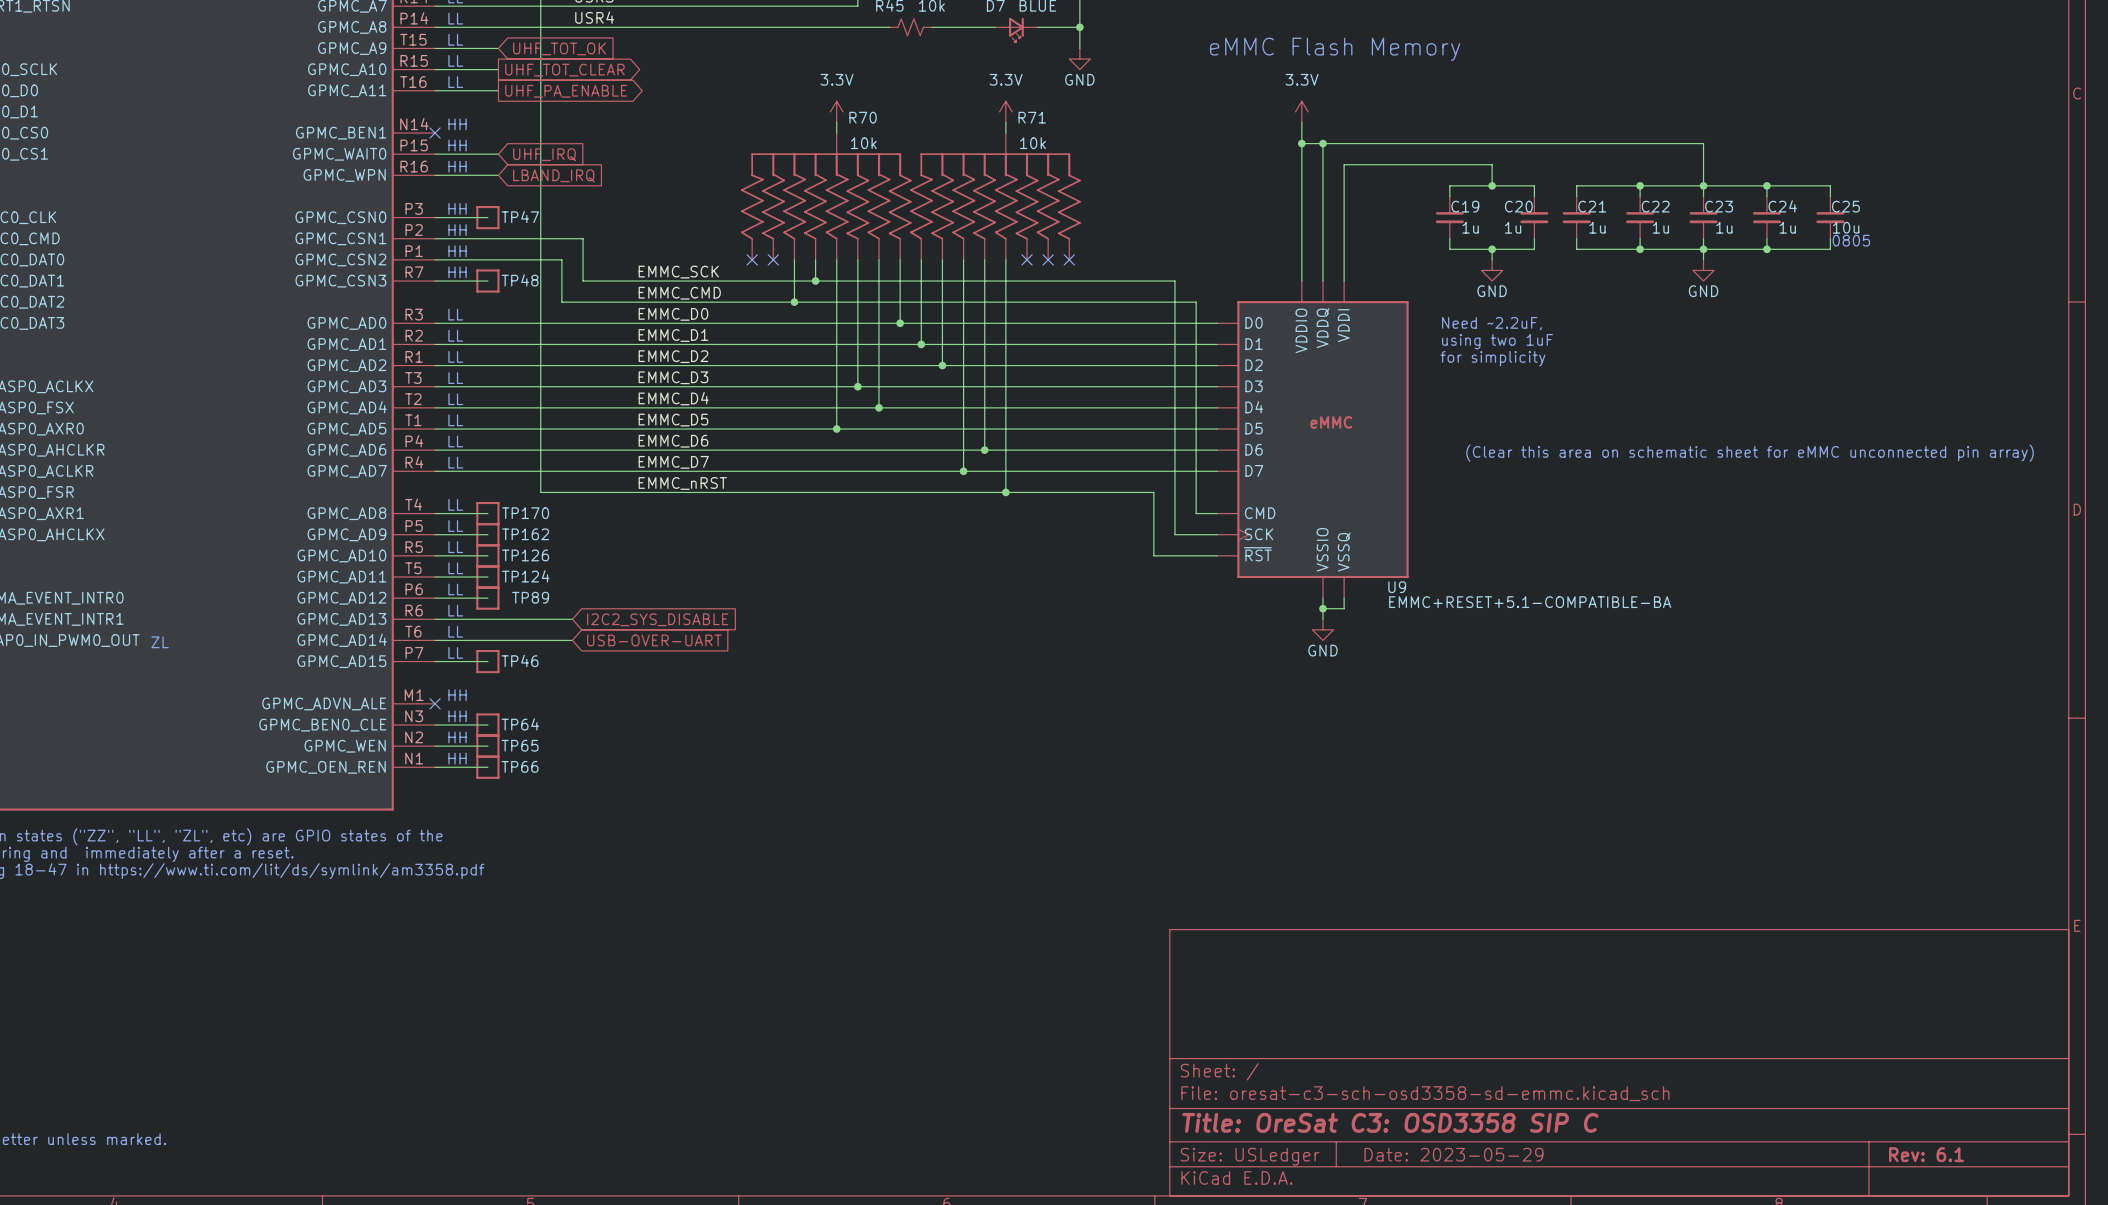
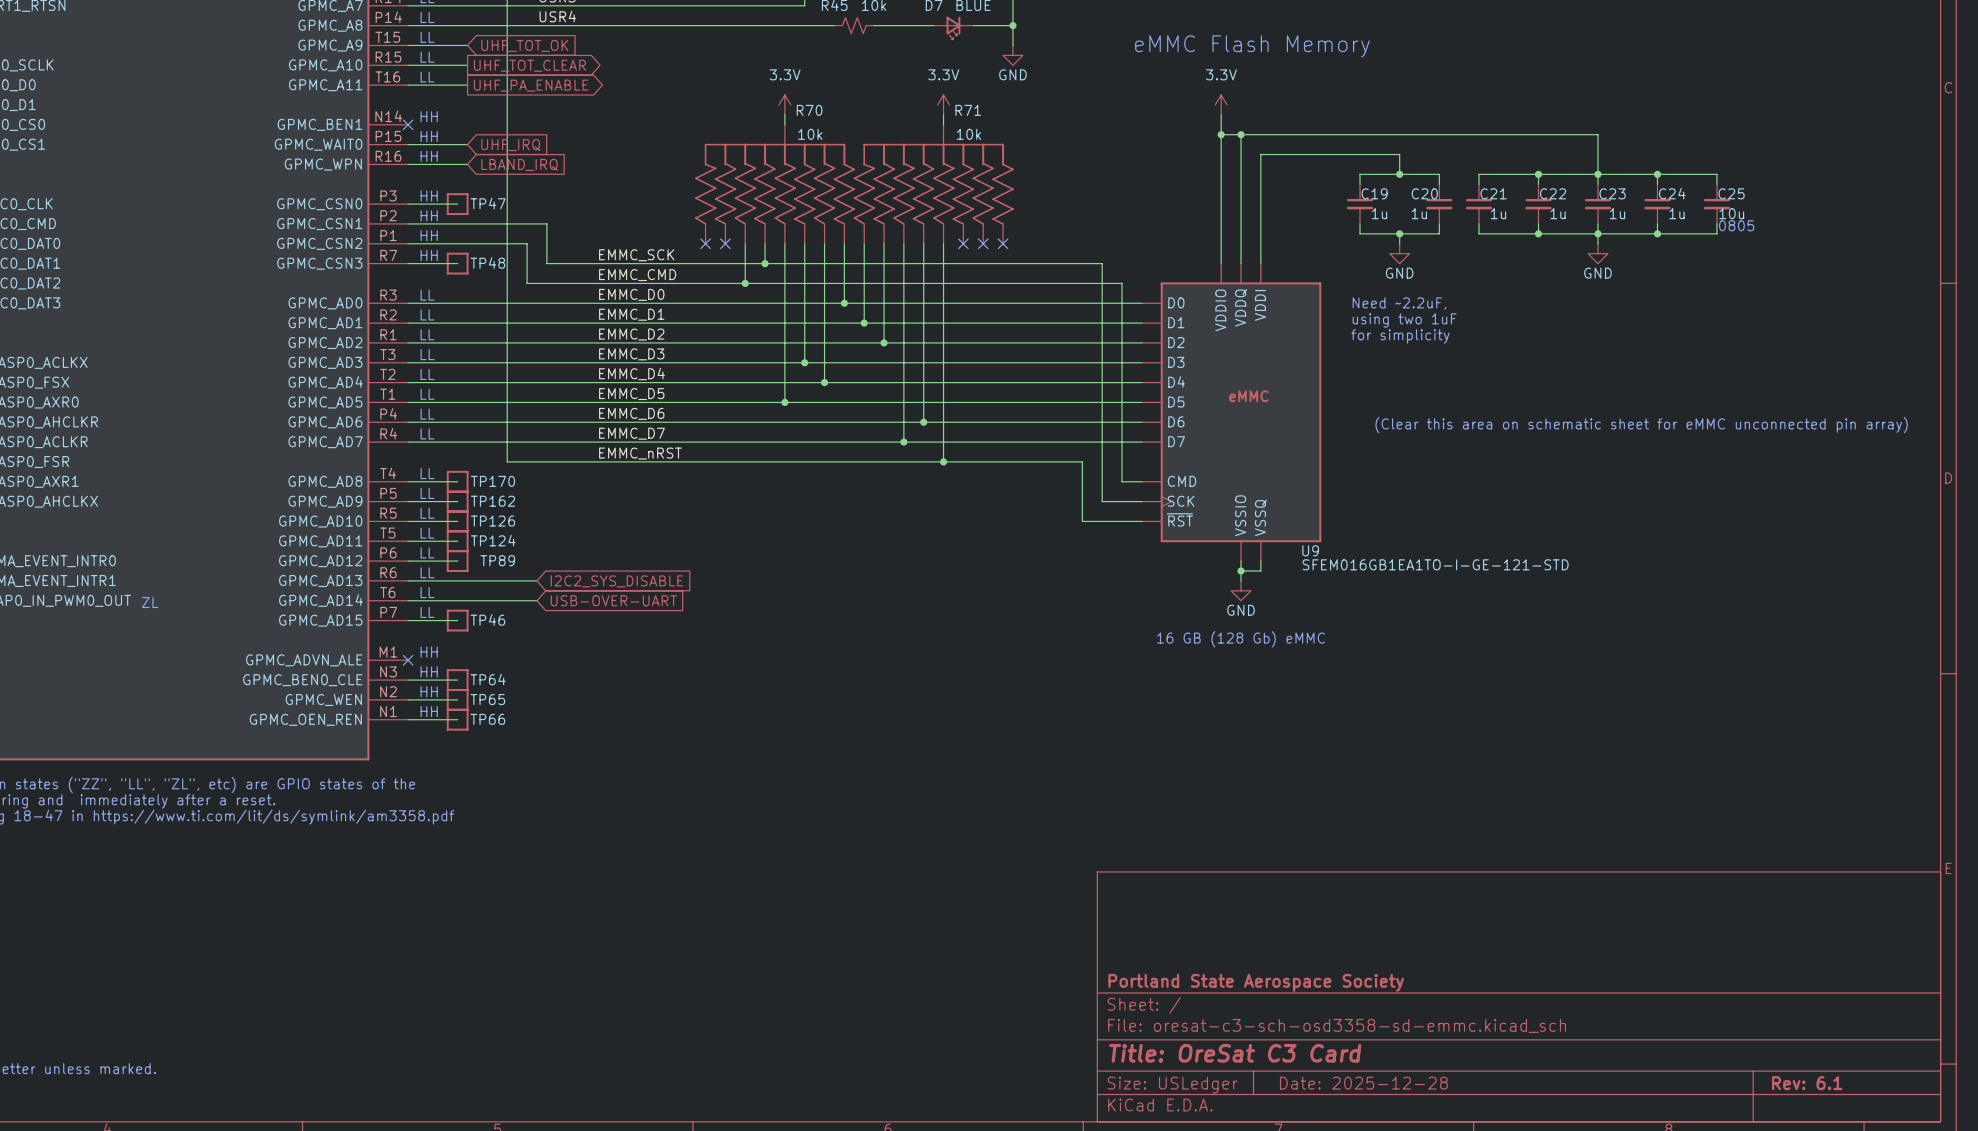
U9 value: EMMC+RESET+5.1-COMPATIBLE-BA (1530, 602) -> SFEM016GB1EA1TO-I-GE-121-STD (1435, 564)
text: none -> 16 GB (128 Gb) eMMC (1241, 639)
title block: none -> Portland State Aerospace Society (1256, 982)
title block: Title: OreSat C3: OSD3358 SIP C (1390, 1122) -> Title: OreSat C3 Card (1235, 1053)
title block: Date: 2023-05-29 (1453, 1154) -> Date: 2025-12-28 (1363, 1083)

